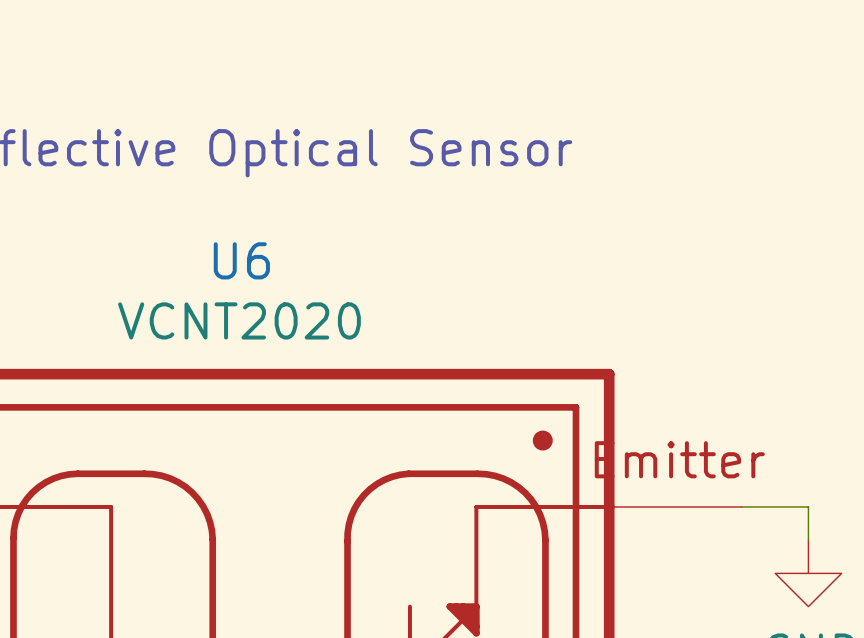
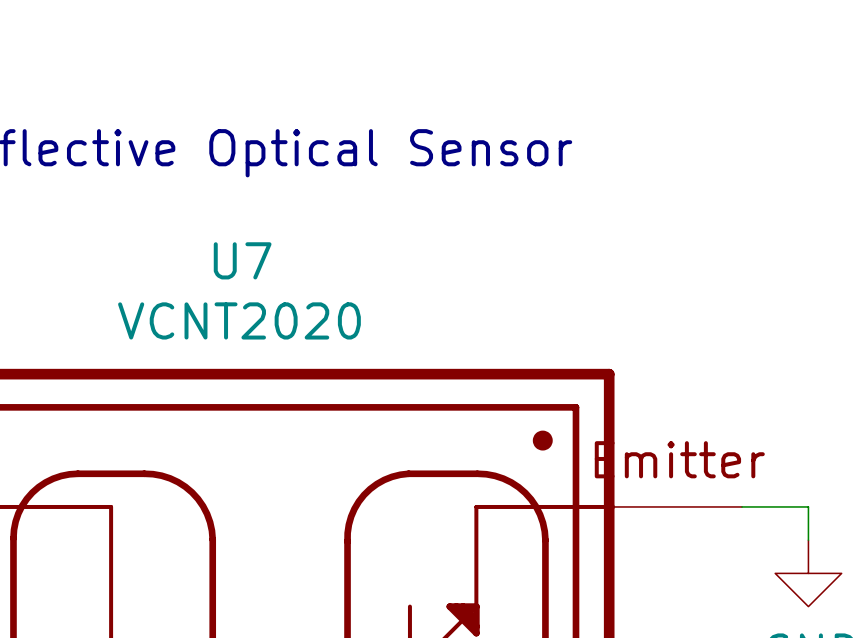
U6 name: U6 (241, 260) -> U7 (242, 260)

